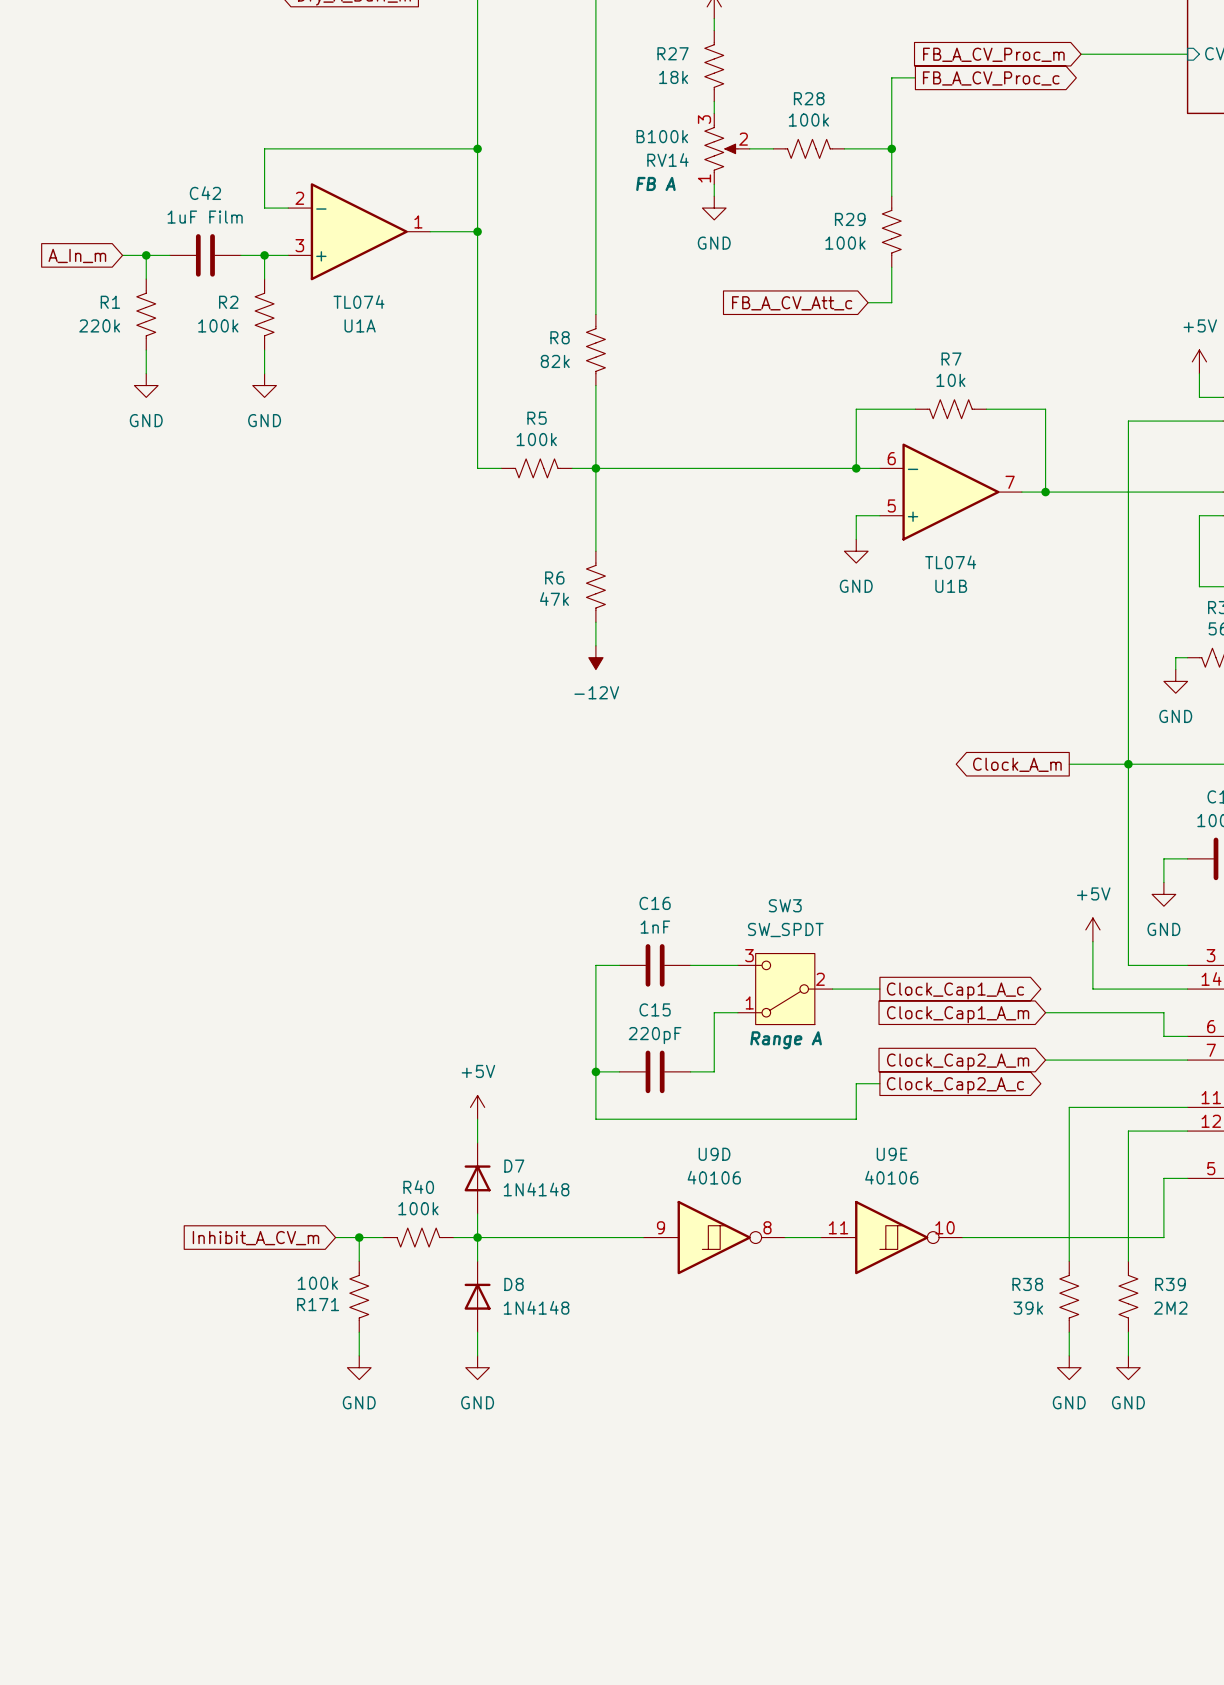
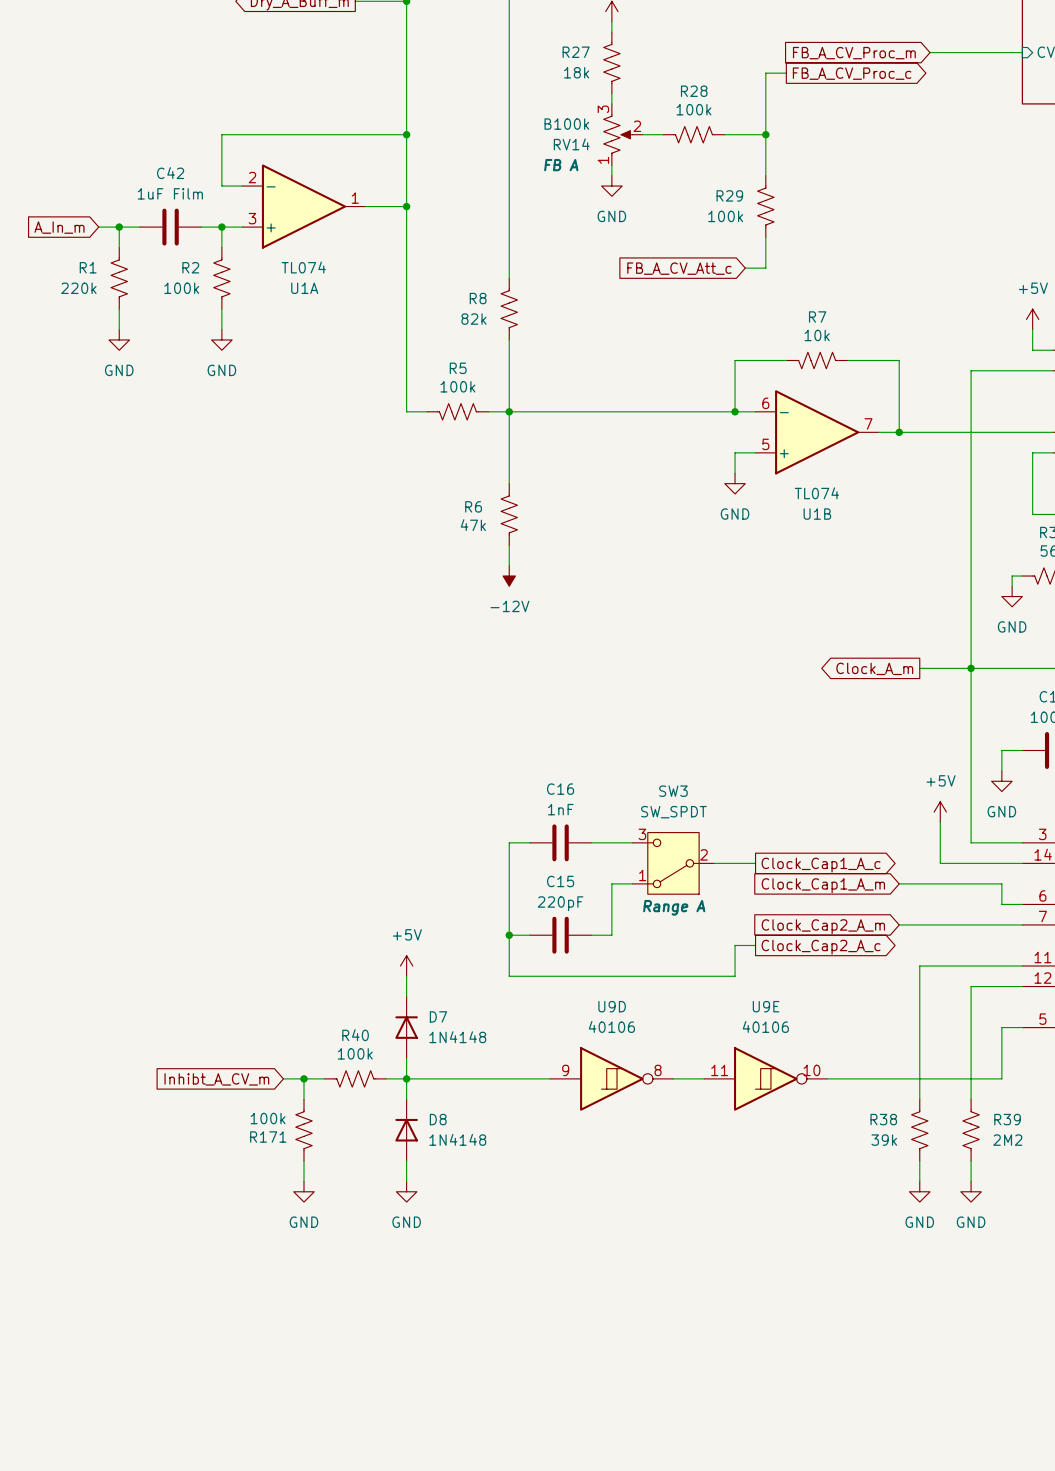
global label: Inhibit_A_CV_m (255, 1238) -> Inhibt_A_CV_m (216, 1079)

